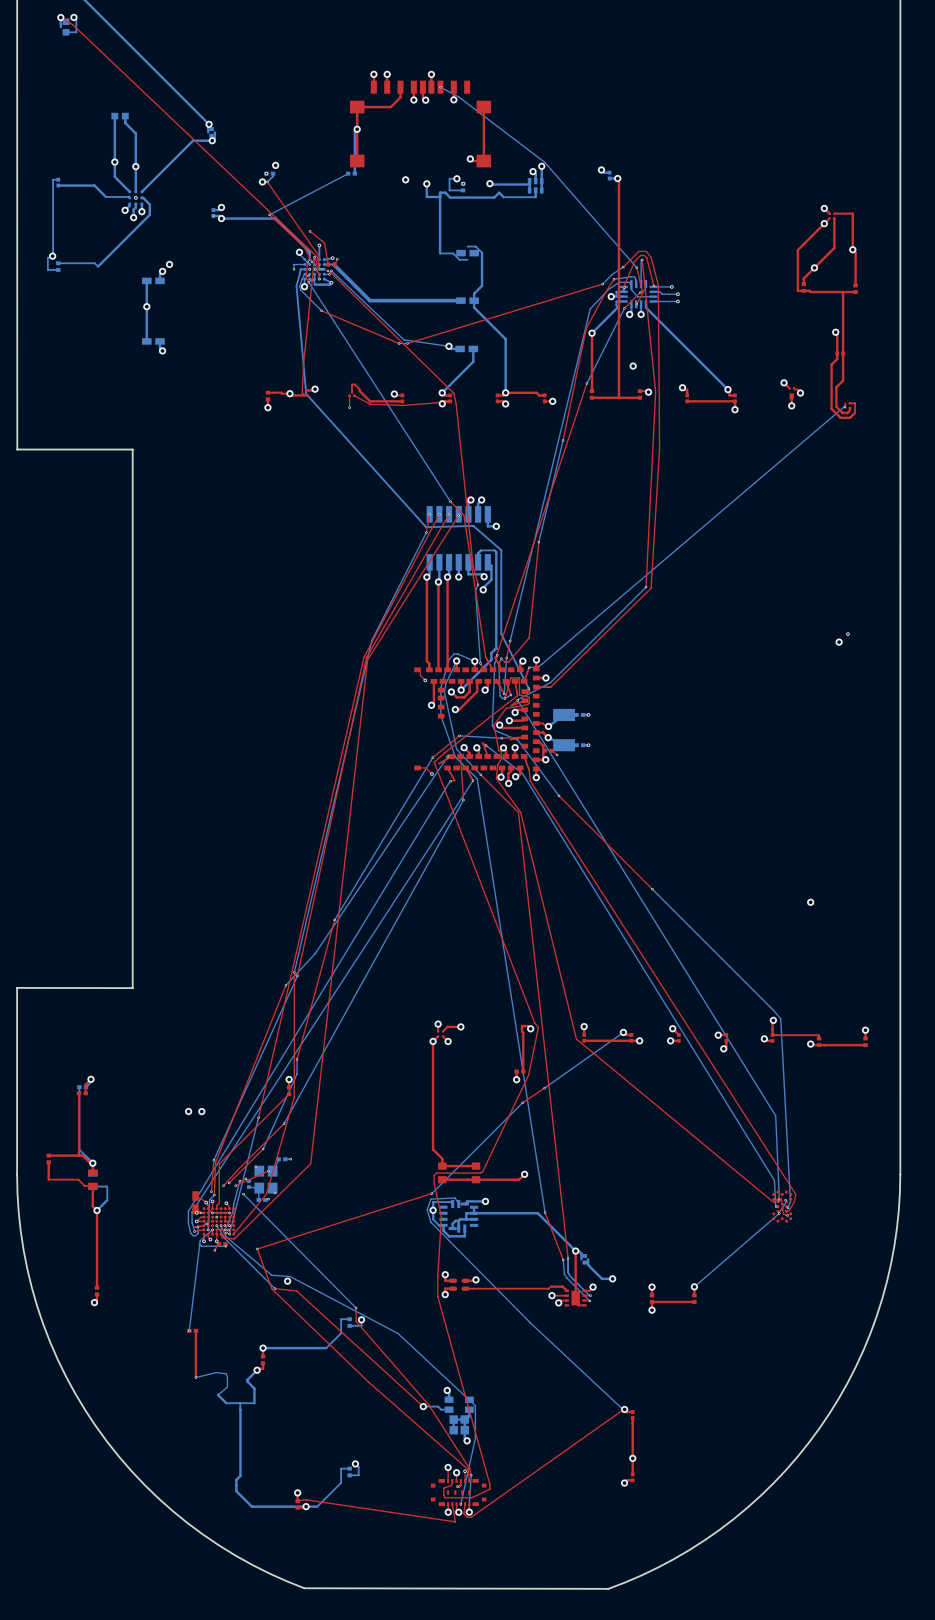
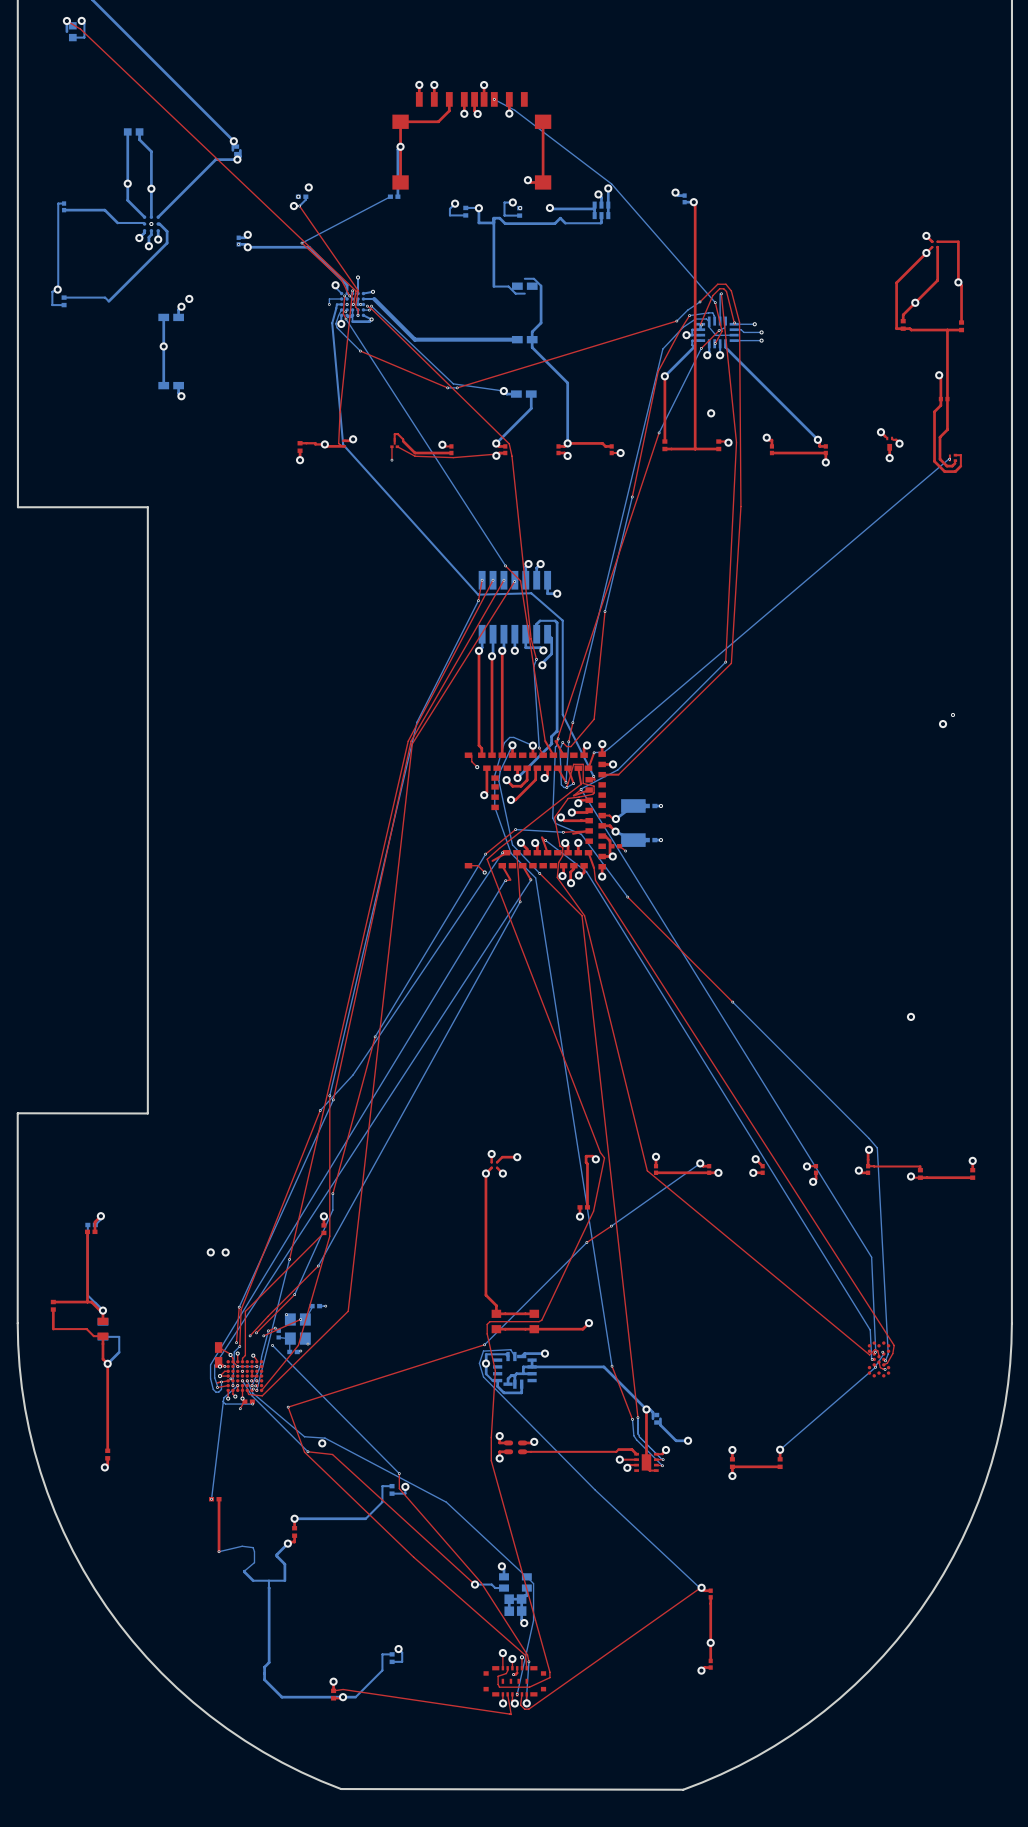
bottom track: none -> (455, 203) (449, 208) (449, 215) (465, 215)
bottom track: none -> (465, 207) (478, 207)
top track: (310, 231) (324, 243) (328, 264) -> none
via: (310, 231) -> none
top track: (337, 259) (334, 264) -> none
via: (337, 259) -> none
part side: top (331, 264) -> bottom (465, 211)

